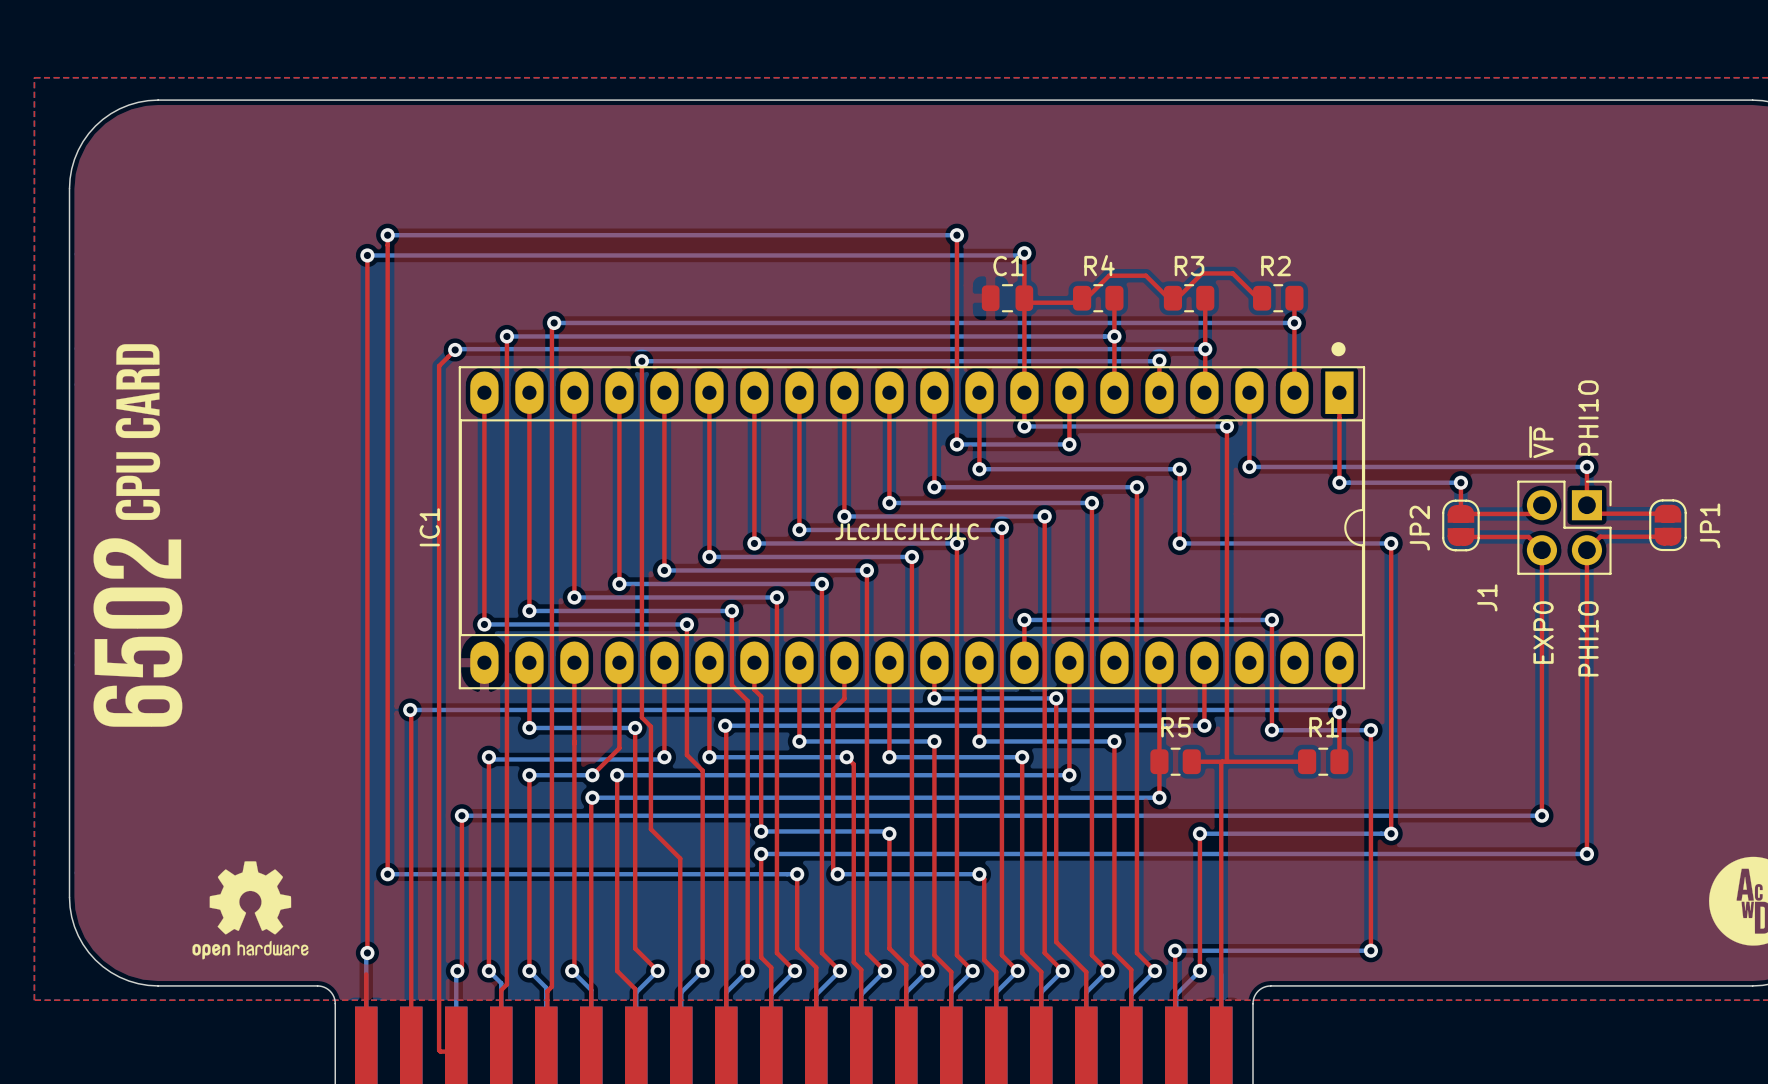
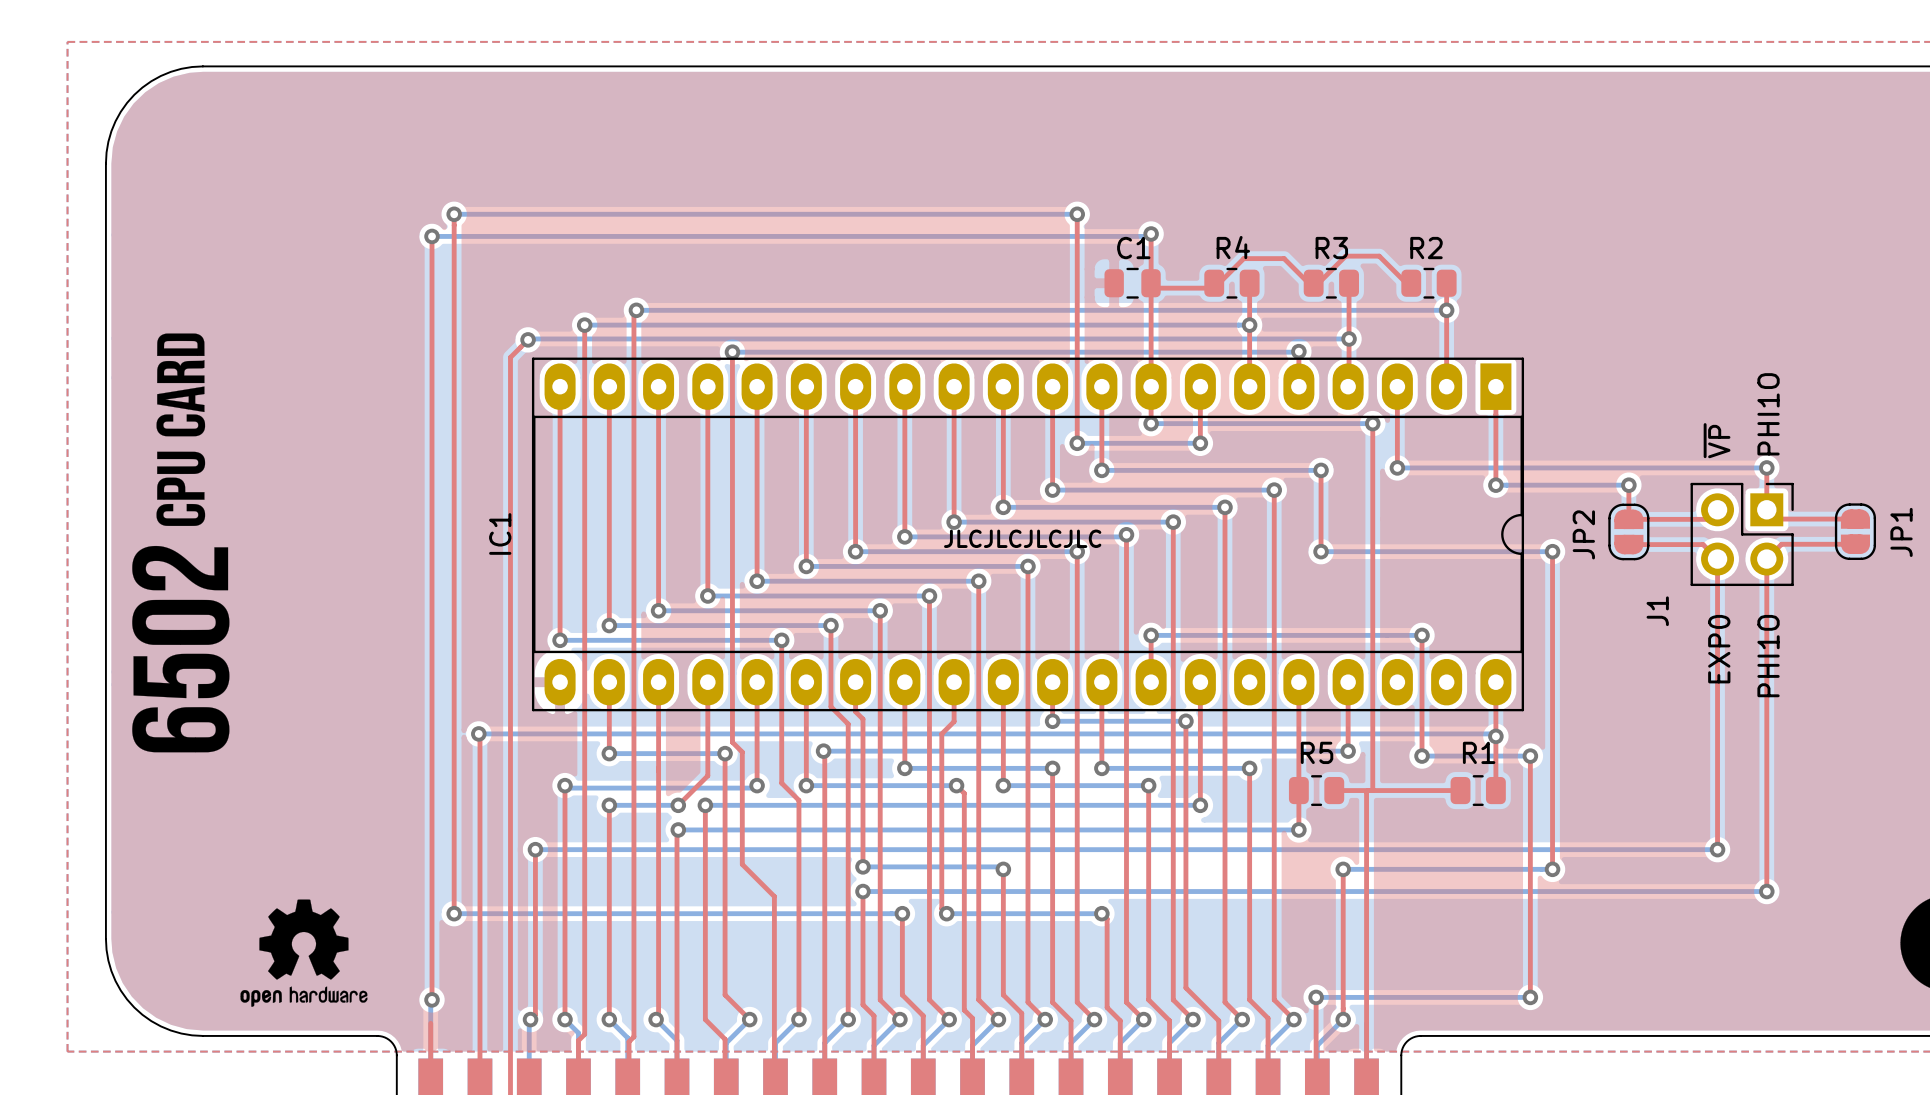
drawing: [1331, 342, 1346, 357] -> none

